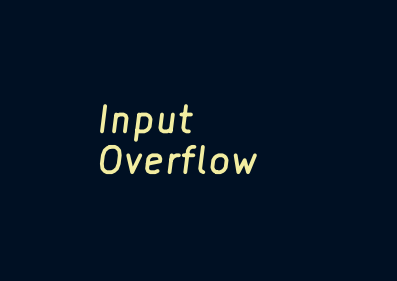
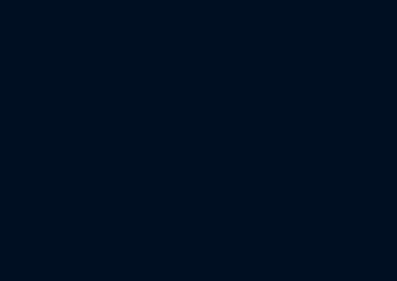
text: Input (146, 122) -> none
text: Overflow (178, 159) -> none

